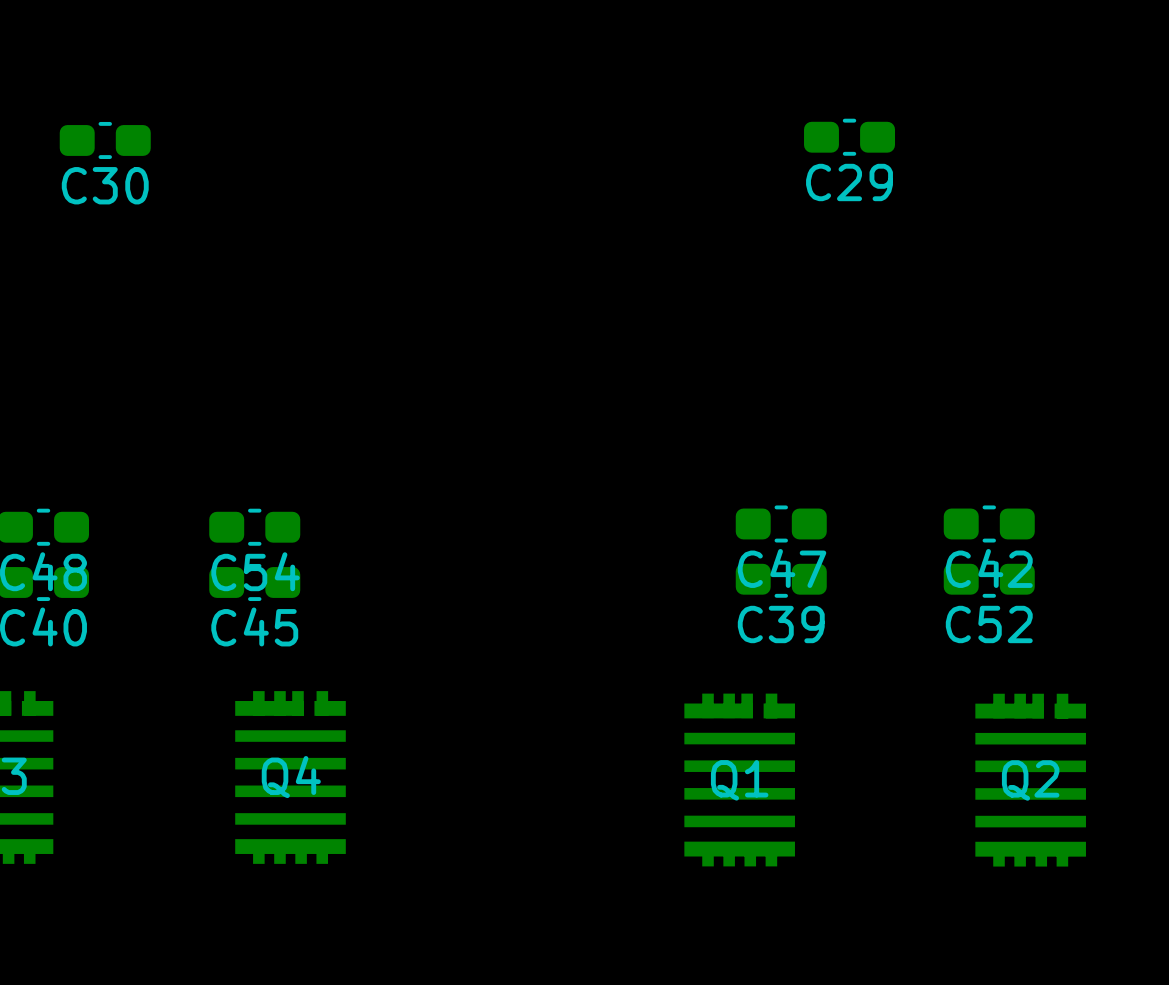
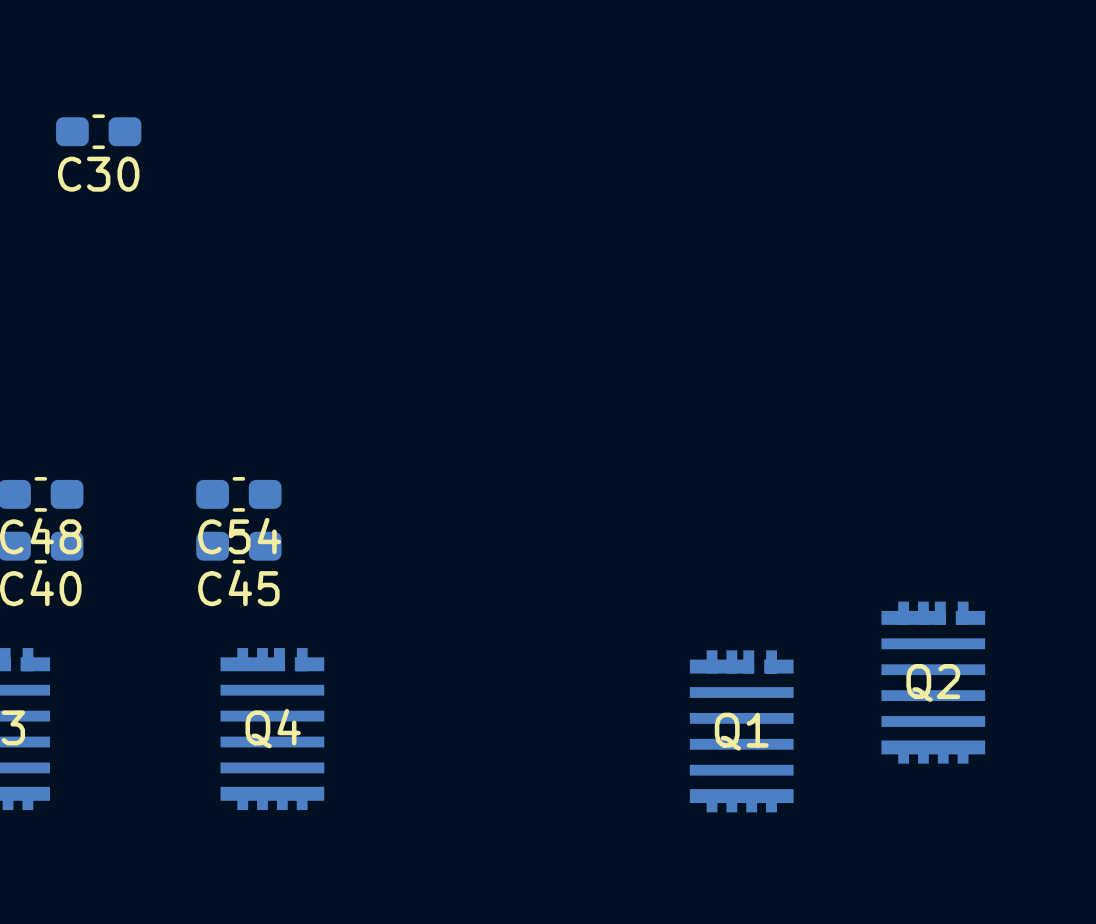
C29: (849, 137) -> none
C47: (781, 523) -> none
C42: (989, 523) -> none
C39: (781, 579) -> none
C52: (989, 579) -> none
Q1 position: (739, 780) -> (741, 731)
Q2 position: (1030, 780) -> (933, 682)

